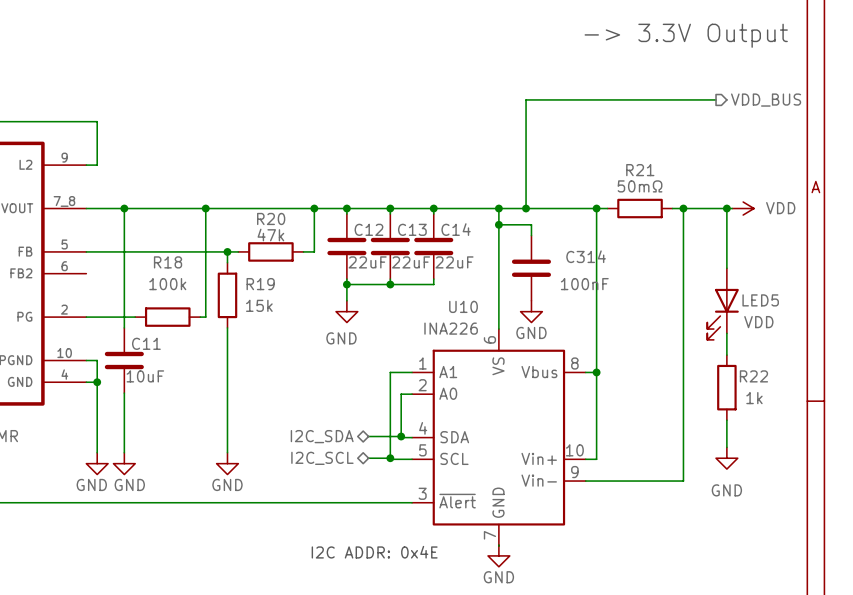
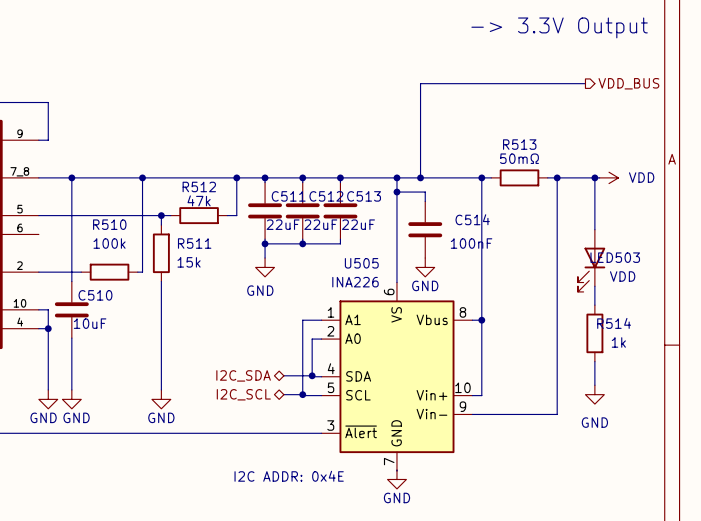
R21 name: R21 (640, 170) -> R513 (519, 144)
R20 name: R20 (271, 218) -> R512 (199, 186)
C12 name: C12 (368, 229) -> C511 (288, 196)
C13 name: C13 (412, 229) -> C512 (326, 196)
C14 name: C14 (456, 229) -> C513 (364, 196)
C314 name: C314 (586, 256) -> C514 (472, 219)
R18 name: R18 (168, 262) -> R510 (109, 224)
R19 name: R19 (260, 284) -> R511 (194, 243)
LED5 name: LED5 (760, 300) -> LED503 (615, 257)
U10 name: U10 (463, 306) -> U505 (361, 263)
C11 name: C11 (146, 343) -> C510 (95, 295)
R22 name: R22 (753, 376) -> R514 (614, 323)

